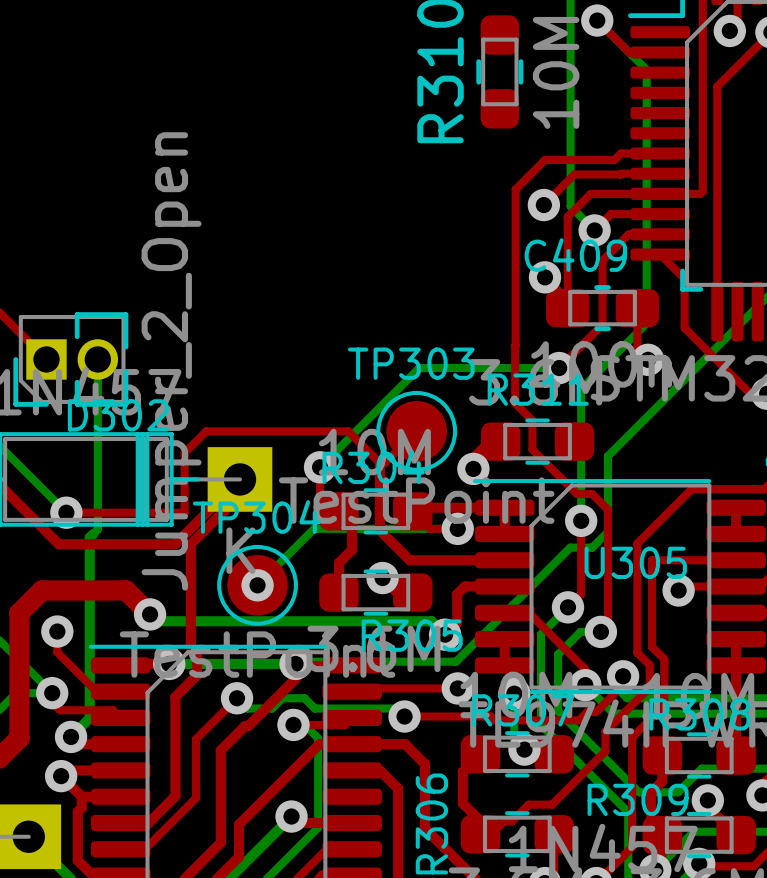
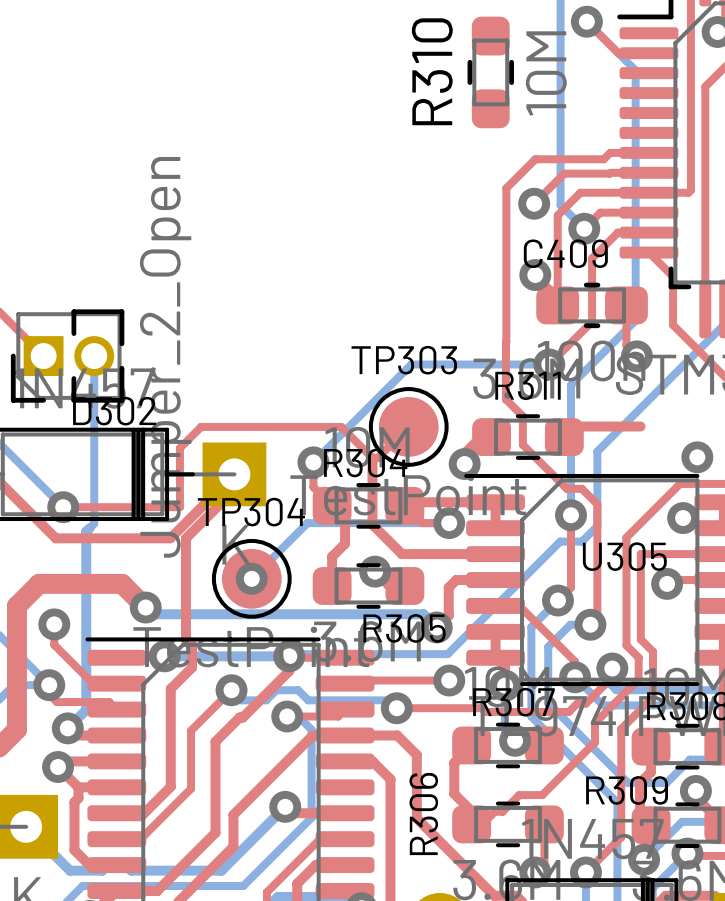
top track: none -> (574, 426) (640, 426)
via: none -> (697, 457)
via: none -> (683, 518)

